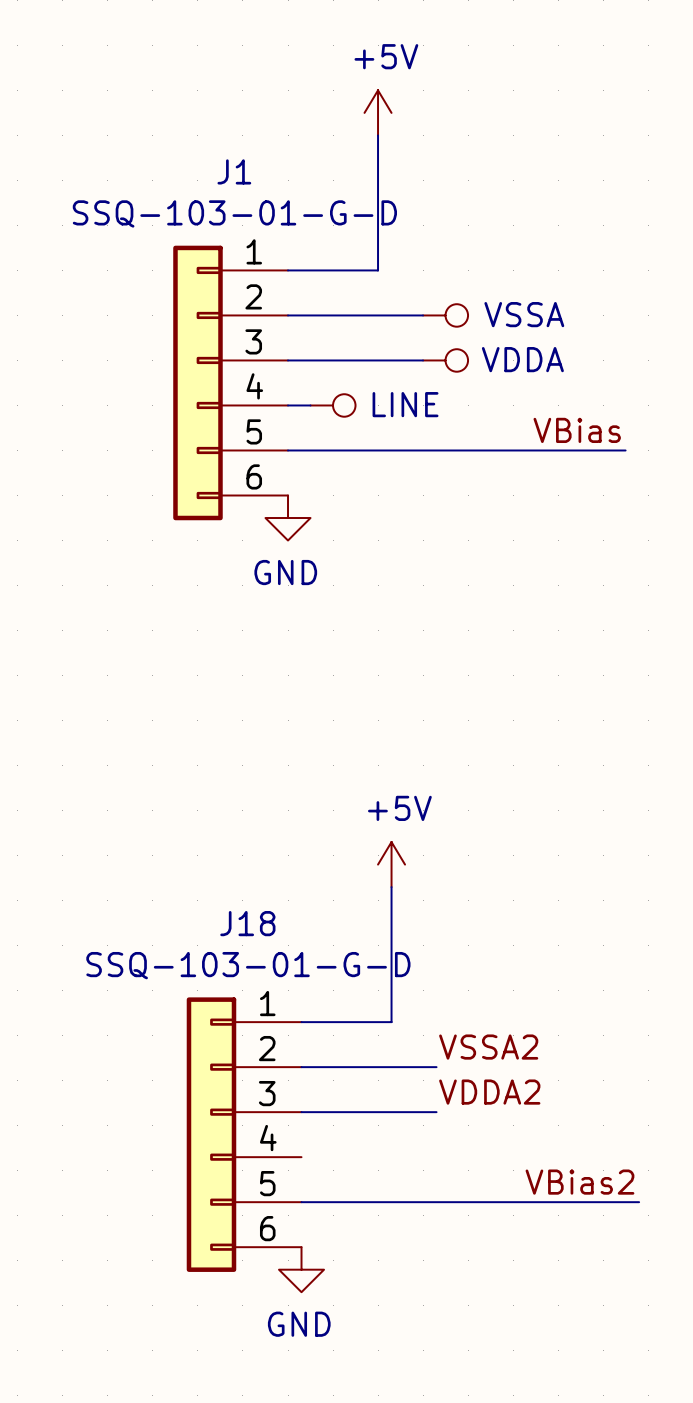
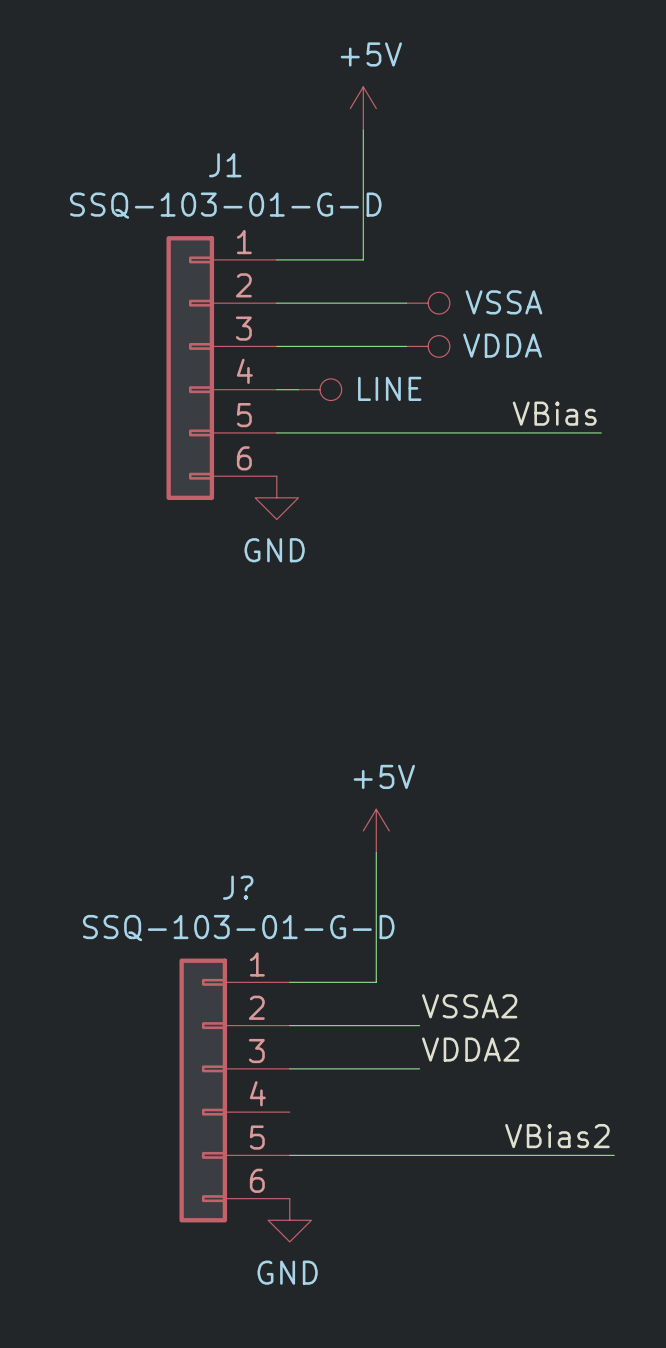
J18 name: J18 (247, 923) -> J? (238, 887)

